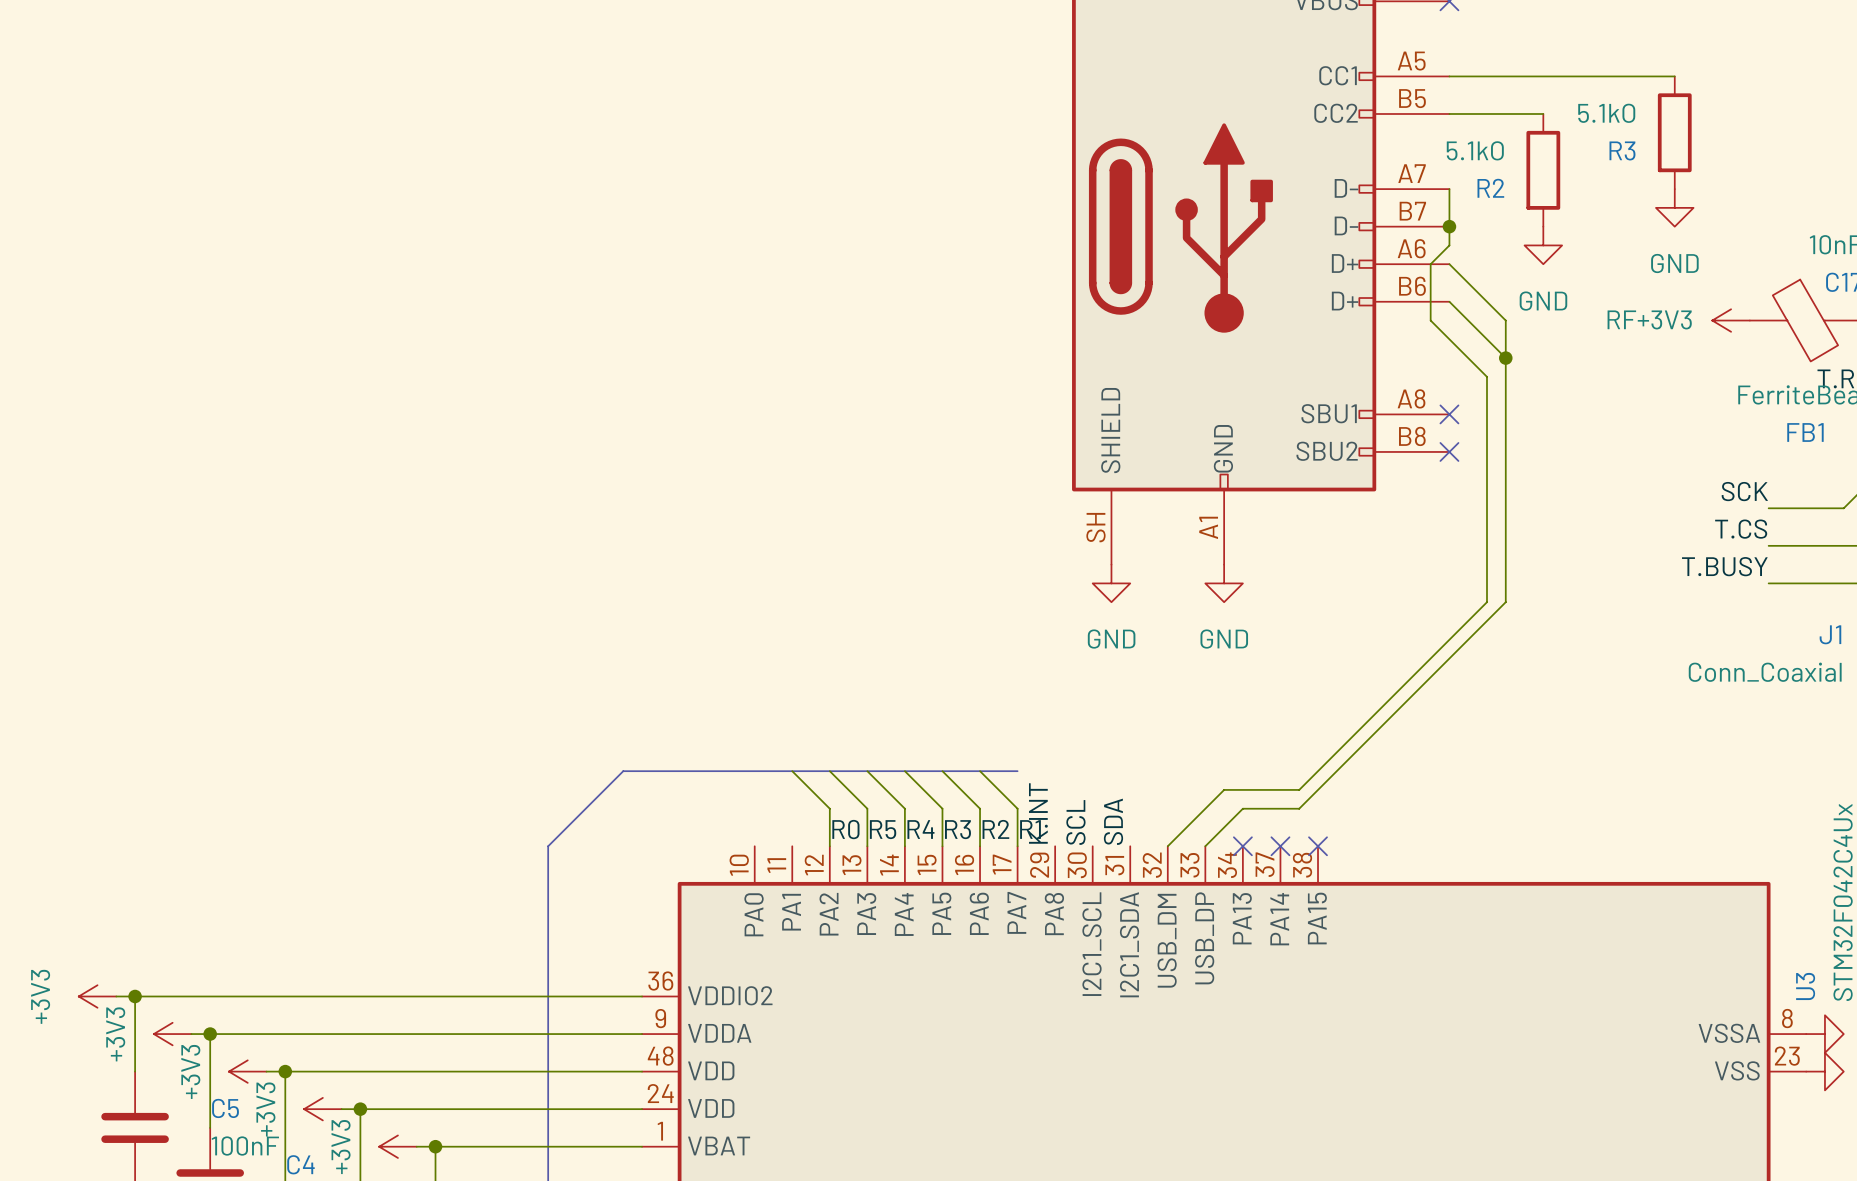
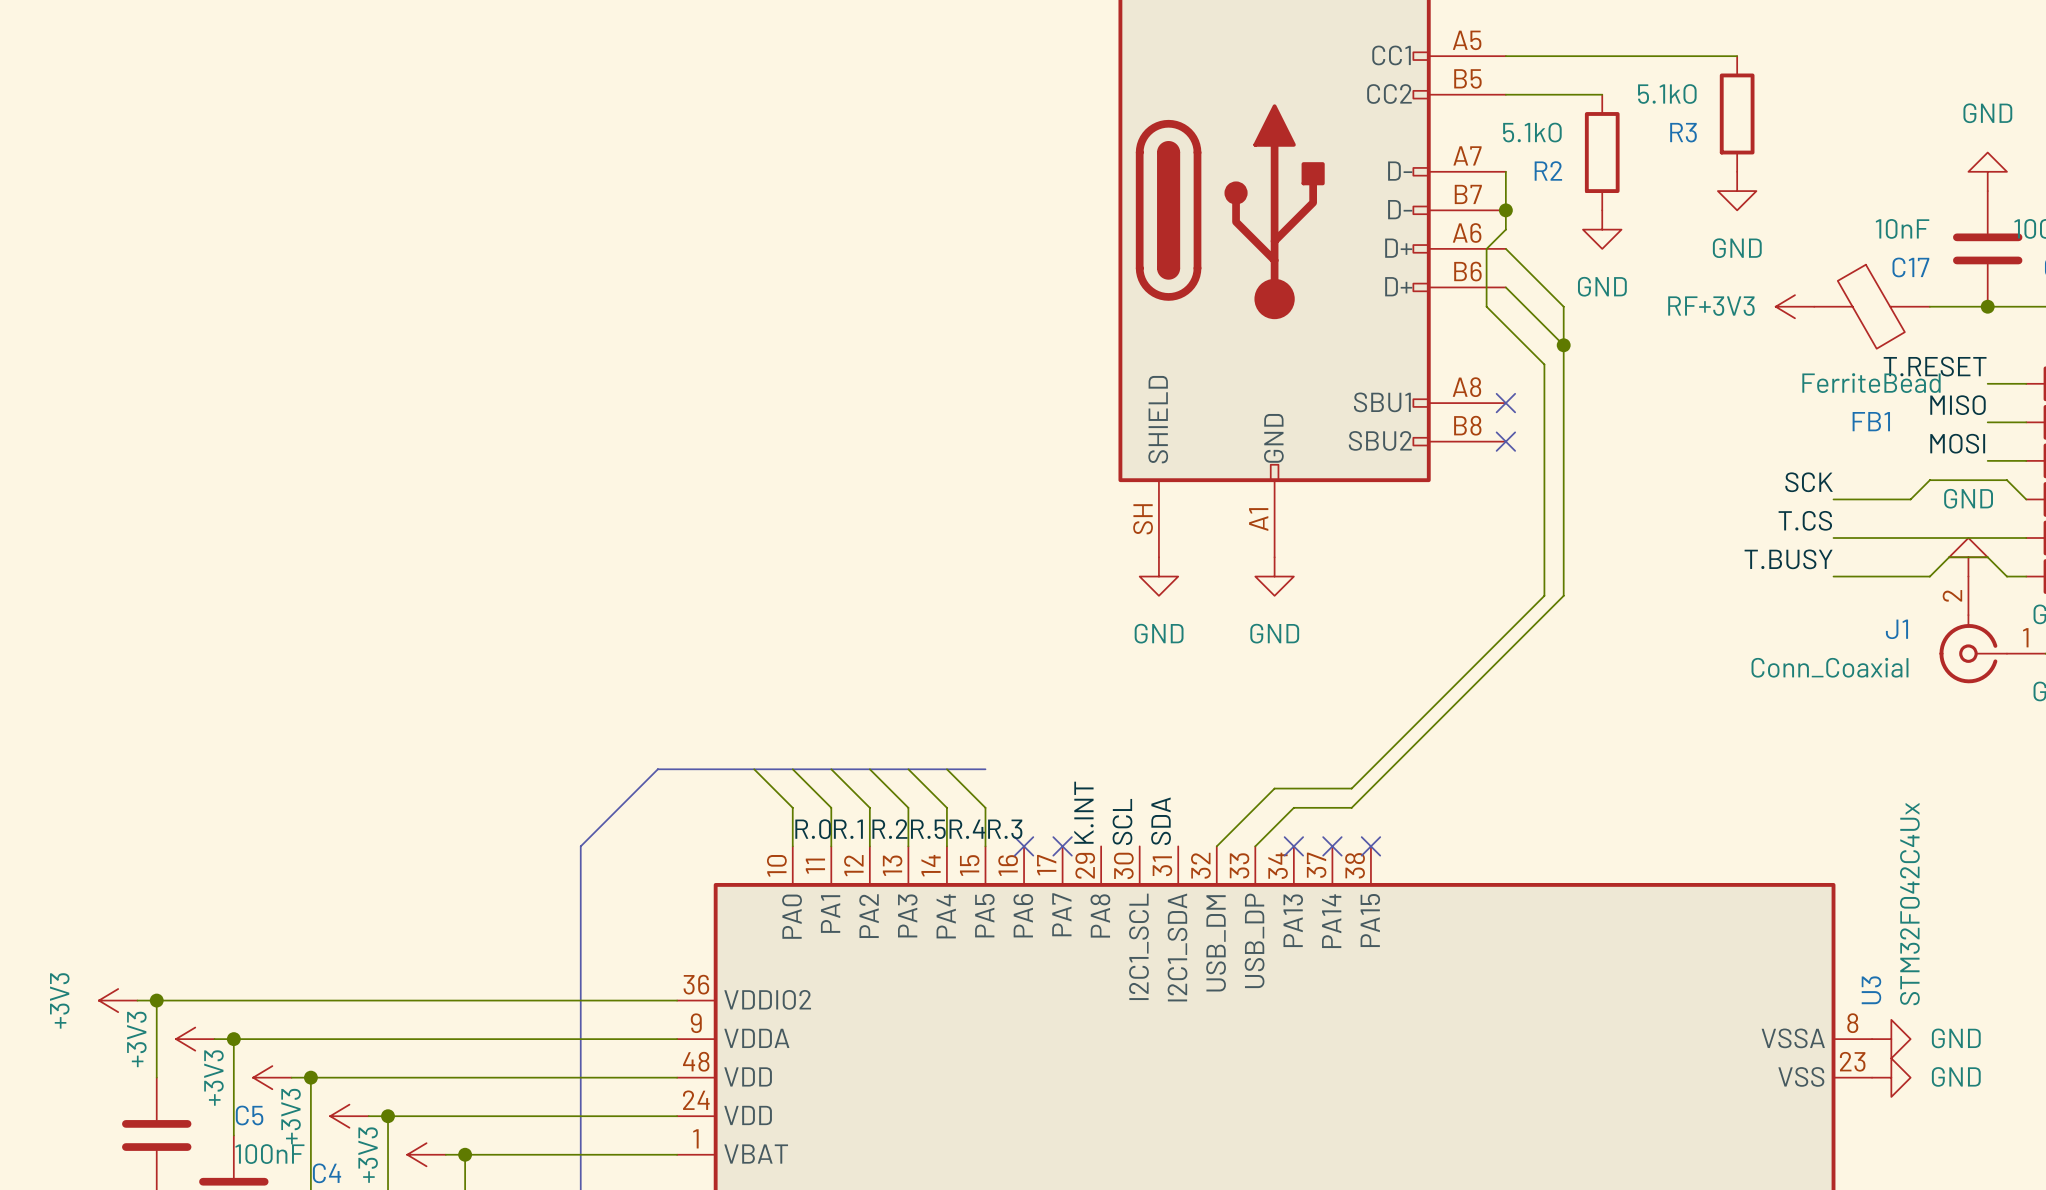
wire: (942, 771) (980, 808) (980, 846) -> (754, 769) (792, 807) (792, 846)
bus: (942, 771) (1017, 771) -> none
wire: (980, 771) (1017, 808) (1017, 846) -> (792, 769) (831, 807) (831, 846)
label: none -> R.0 (813, 829)
label: none -> R.1 (848, 829)
label: R0 (845, 829) -> R.2 (889, 829)
label: R5 (883, 829) -> R.5 (928, 829)
label: R4 (920, 829) -> R.4 (967, 829)
label: R3 (957, 829) -> R.3 (1005, 829)
label: R2 (995, 829) -> none
label: R1 (1030, 829) -> none
no-connect mark: none -> (1024, 846)
no-connect mark: none -> (1062, 846)

